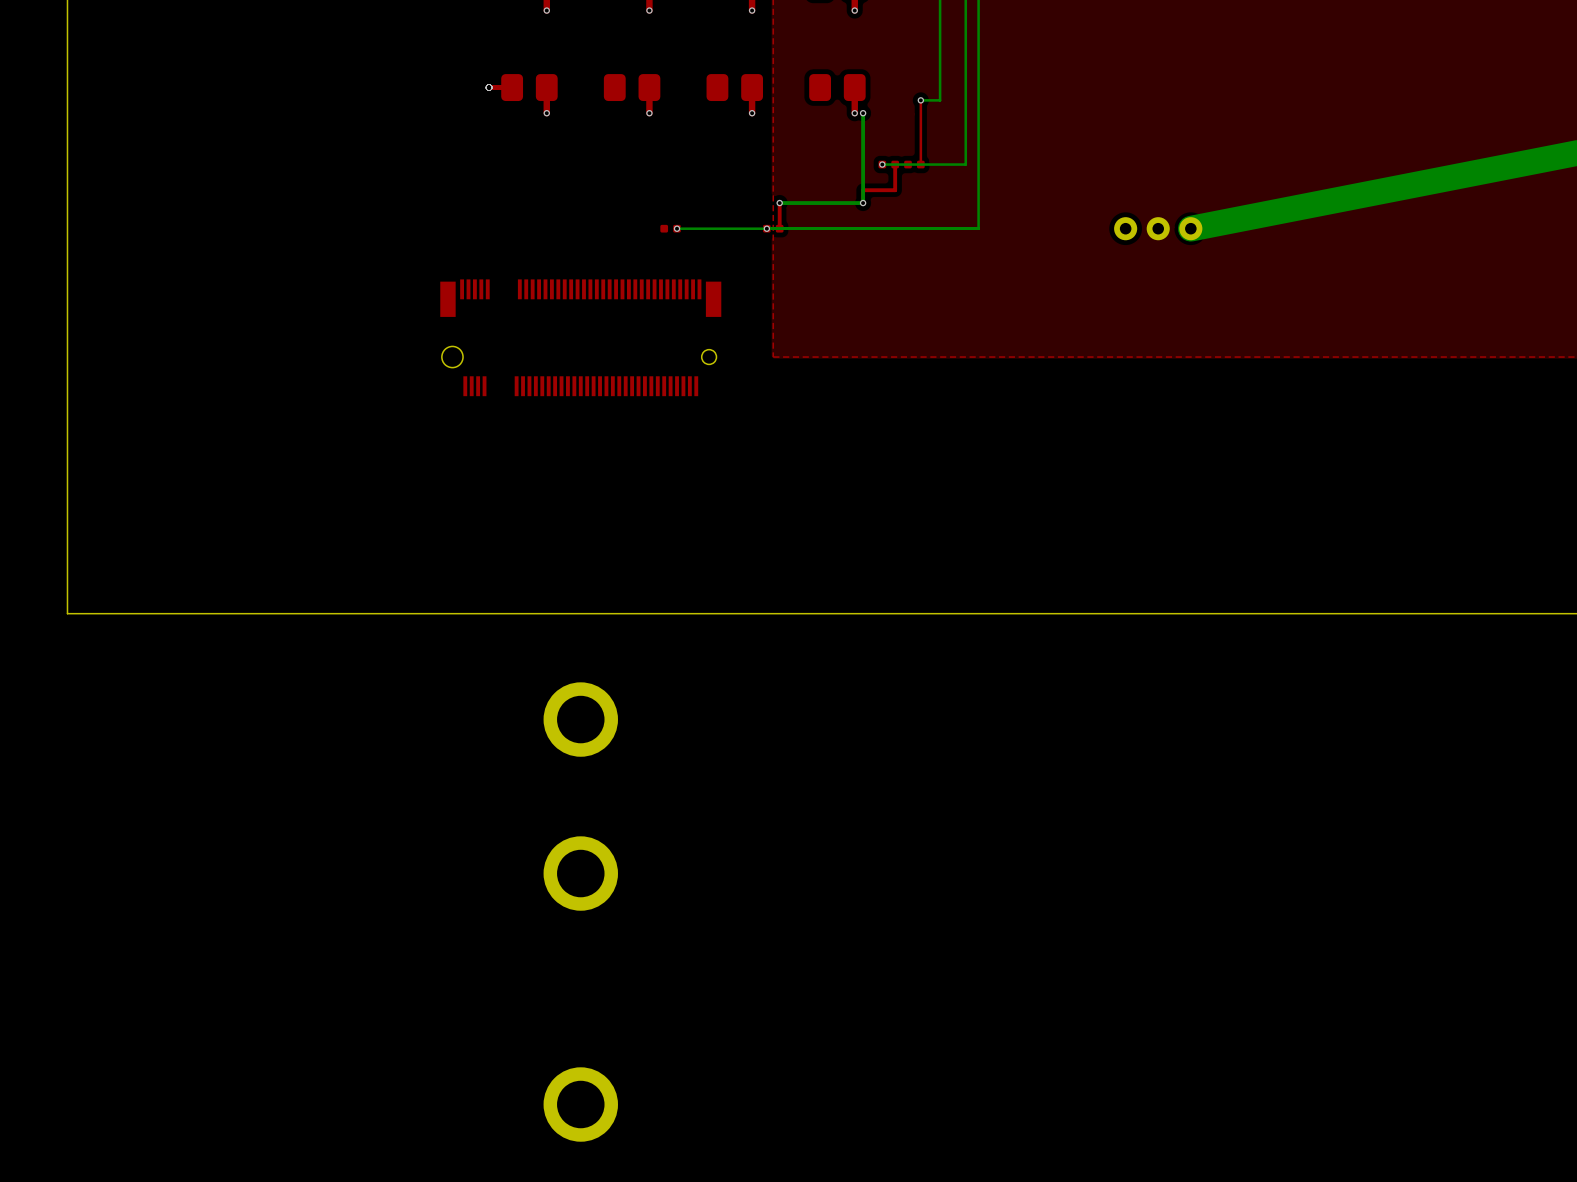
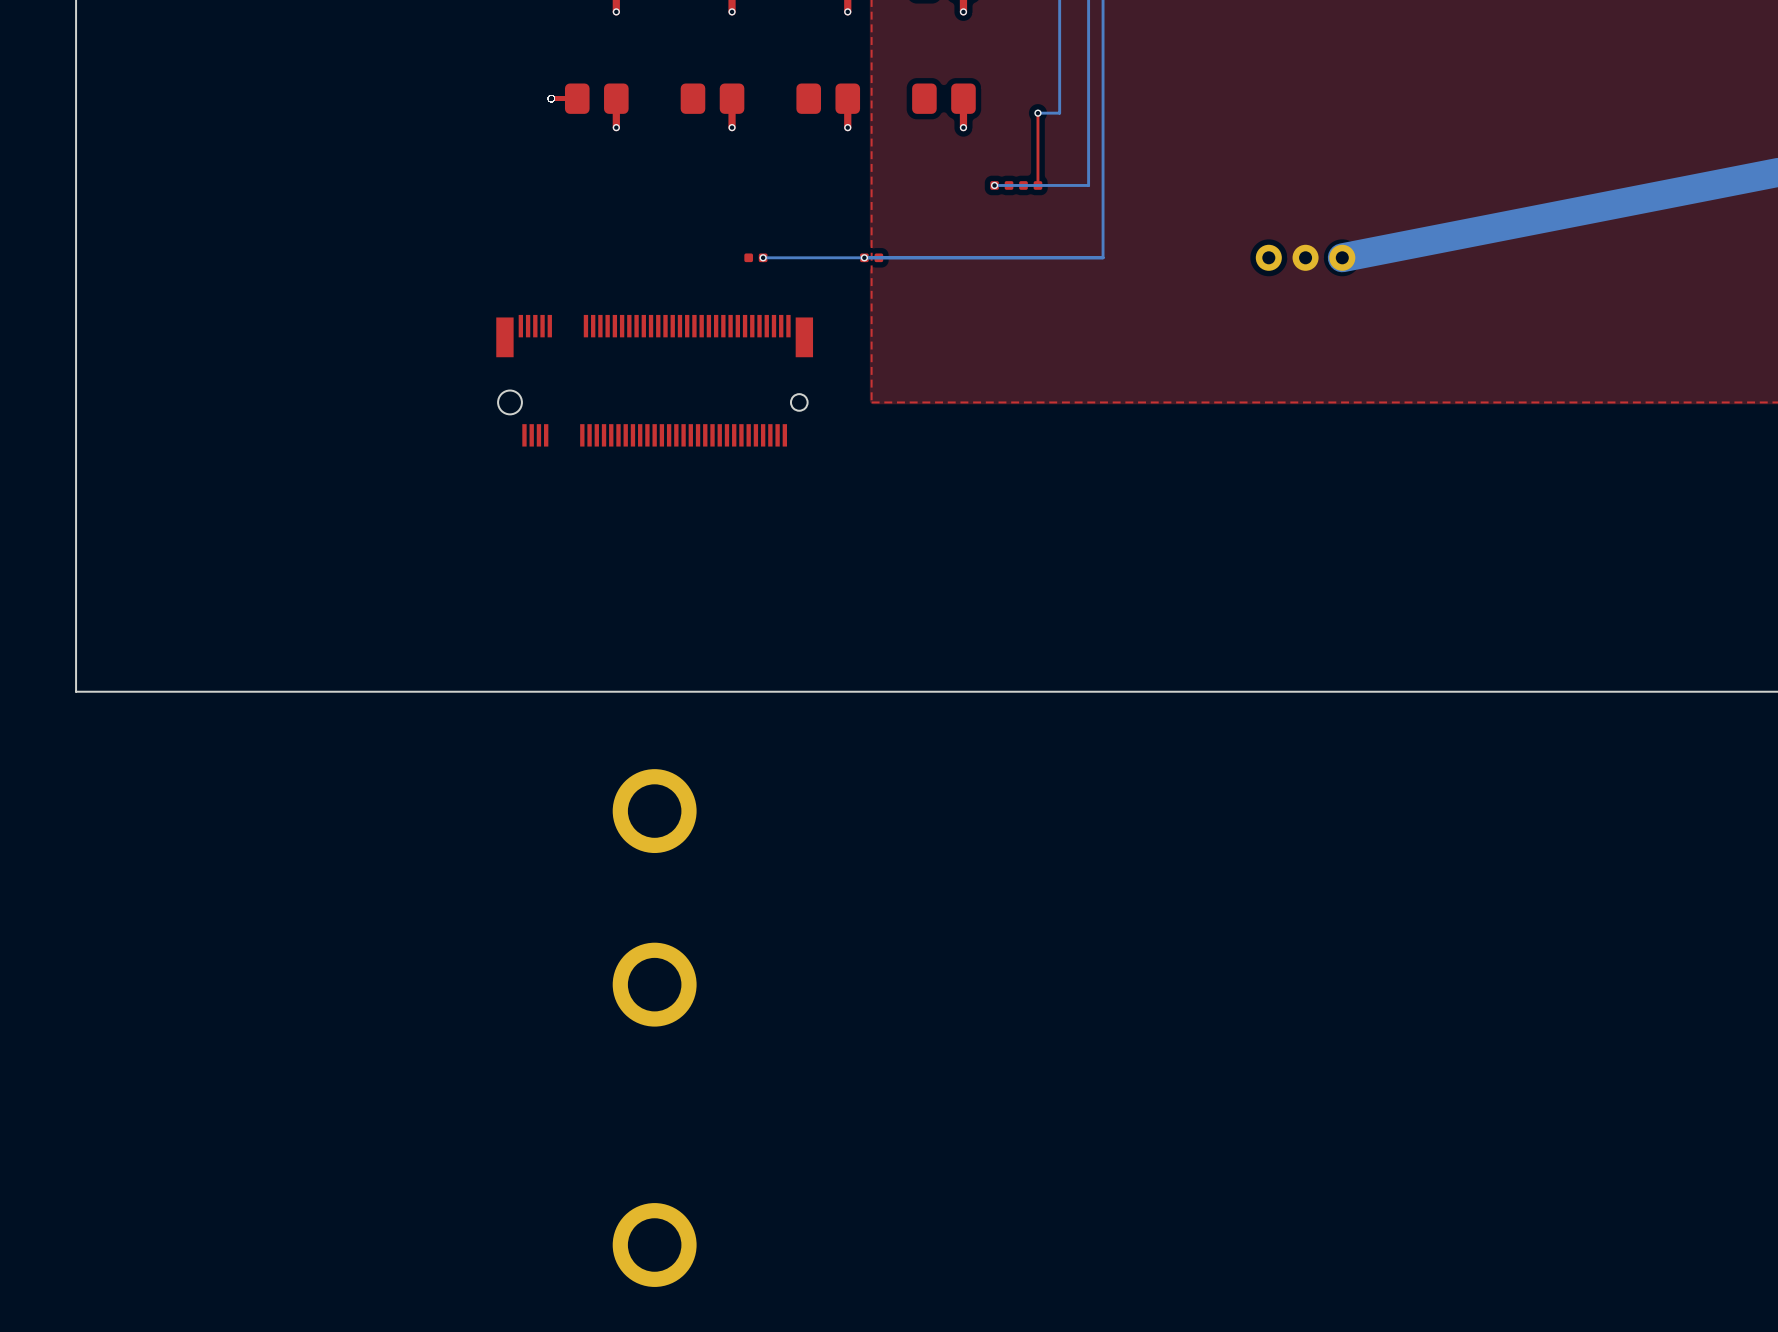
bottom track: (863, 113) (863, 203) (779, 203) -> none
via: (863, 113) -> none
top track: (895, 164) (895, 190) (863, 190) (863, 203) -> none
top track: (779, 203) (779, 228) -> none
via: (779, 203) -> none
via: (863, 203) -> none

